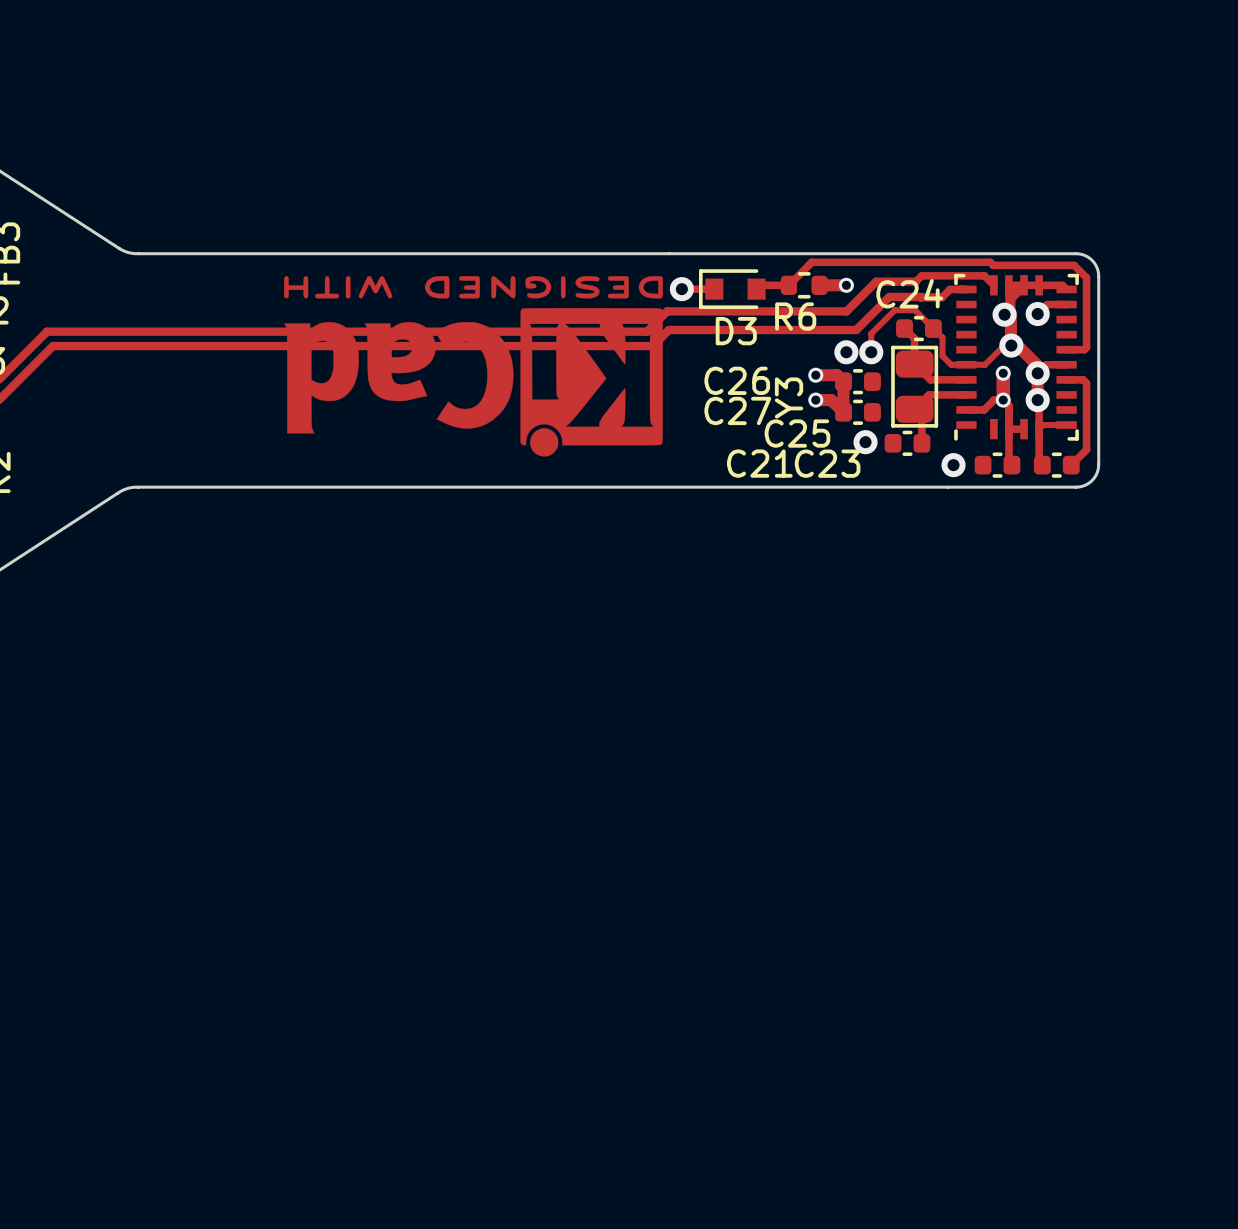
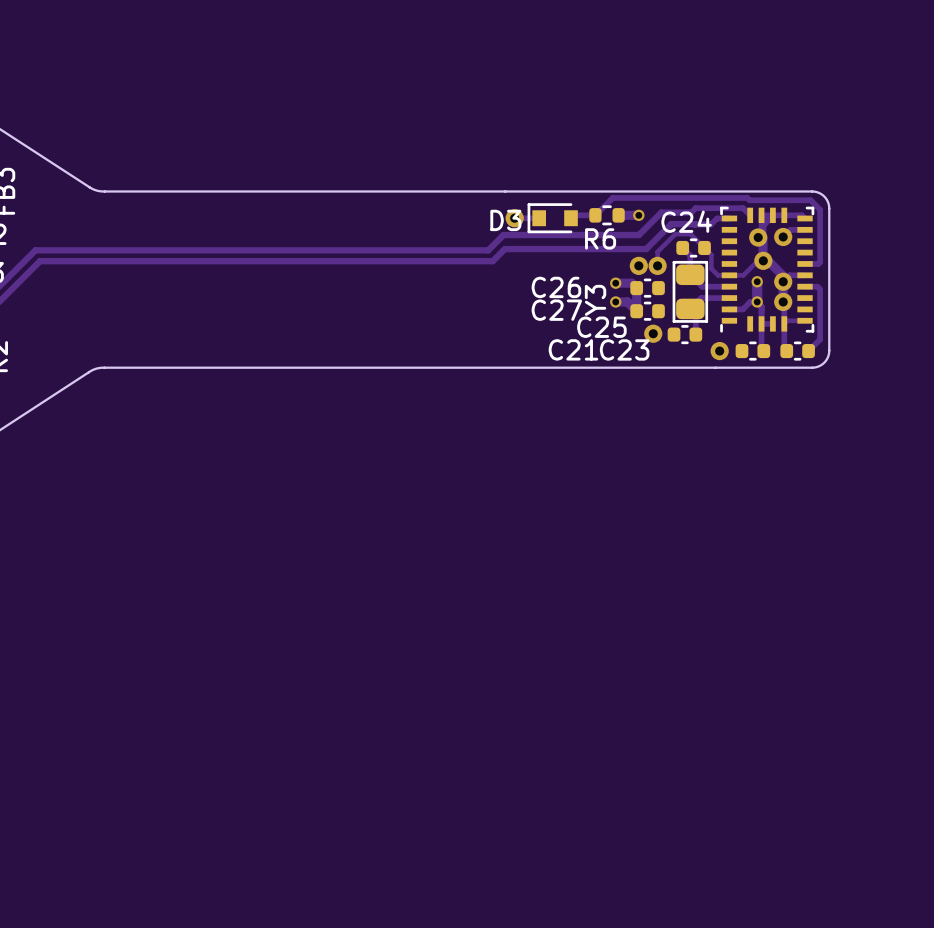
drawing: [284, 276, 663, 457] -> none
D3 name position: D3 (736, 331) -> D3 (505, 220)

